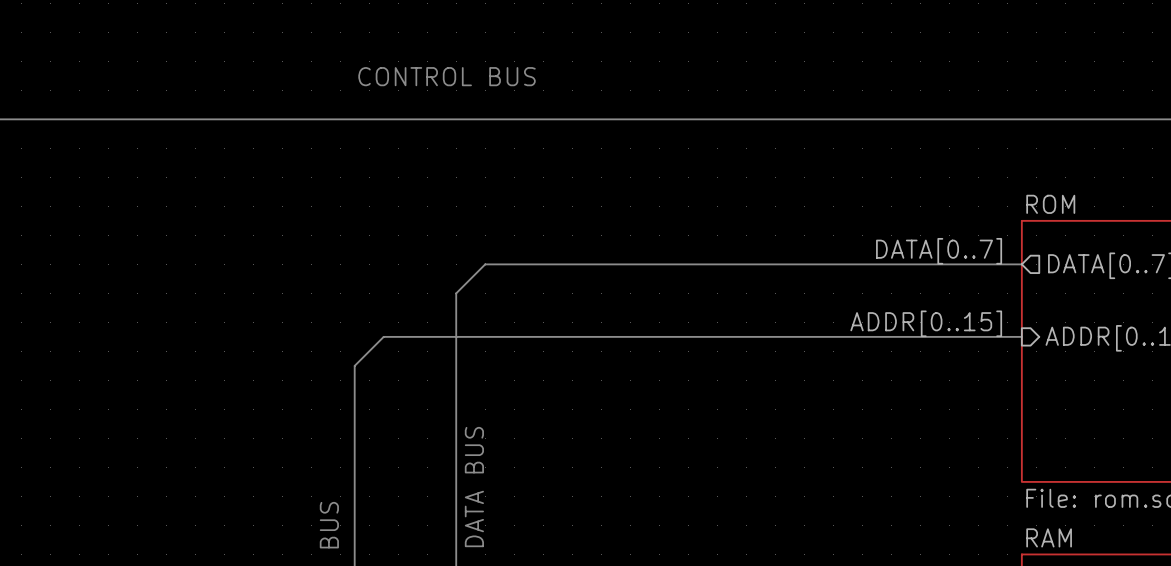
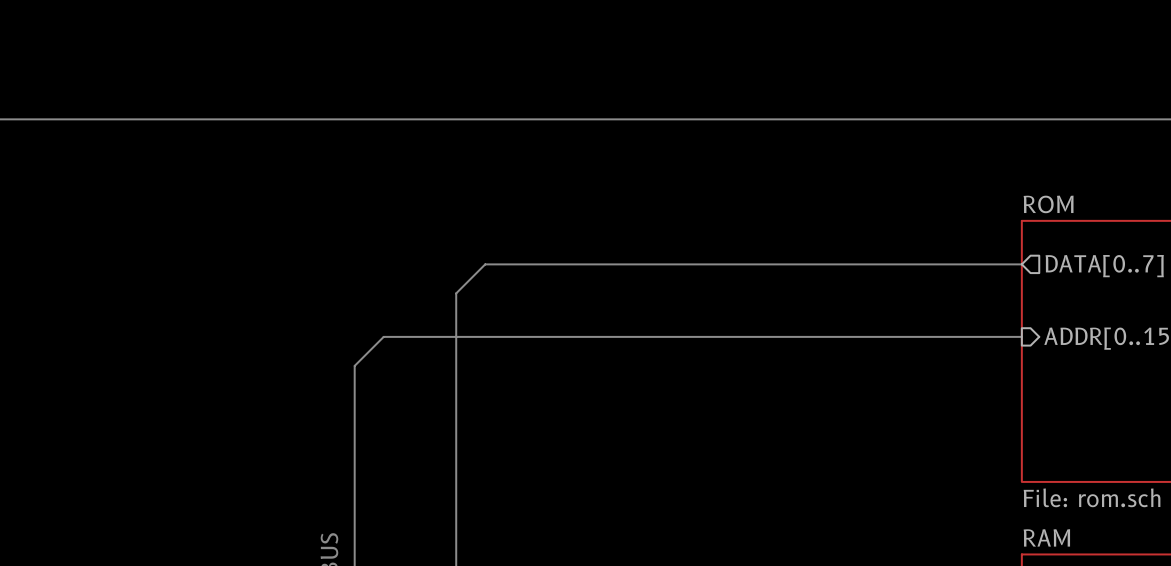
text: CONTROL BUS (447, 76) -> none
label: DATA[0..7] (939, 251) -> none
label: ADDR[0..15] (926, 323) -> none
text: DATA BUS (474, 487) -> none

